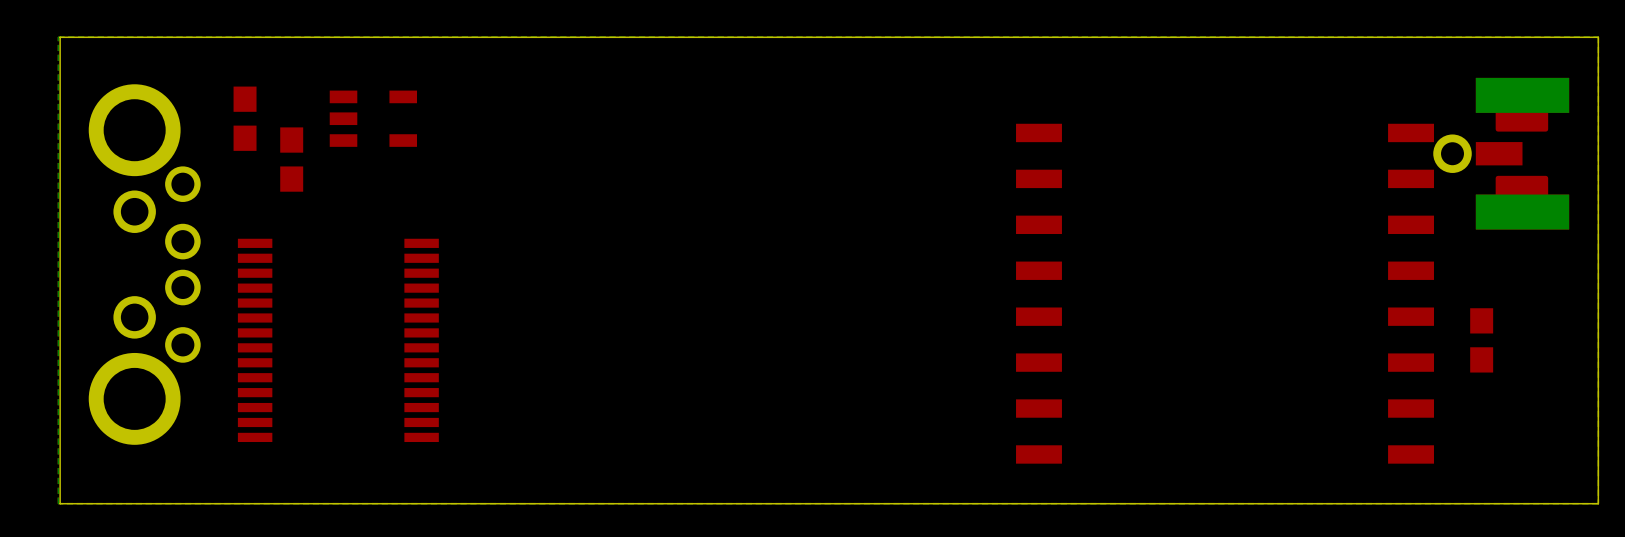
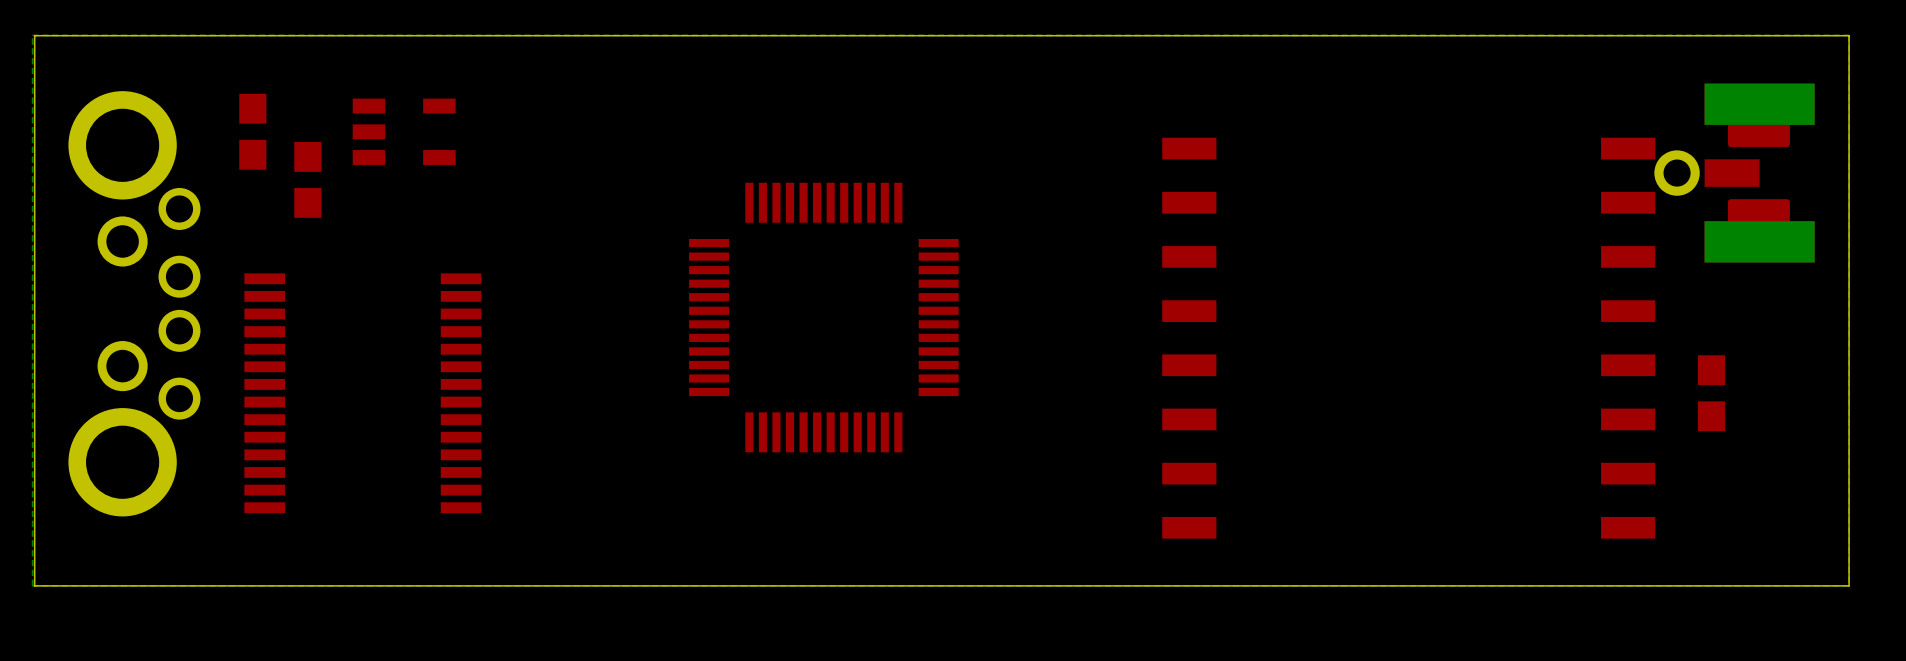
part: none -> (823, 317)

